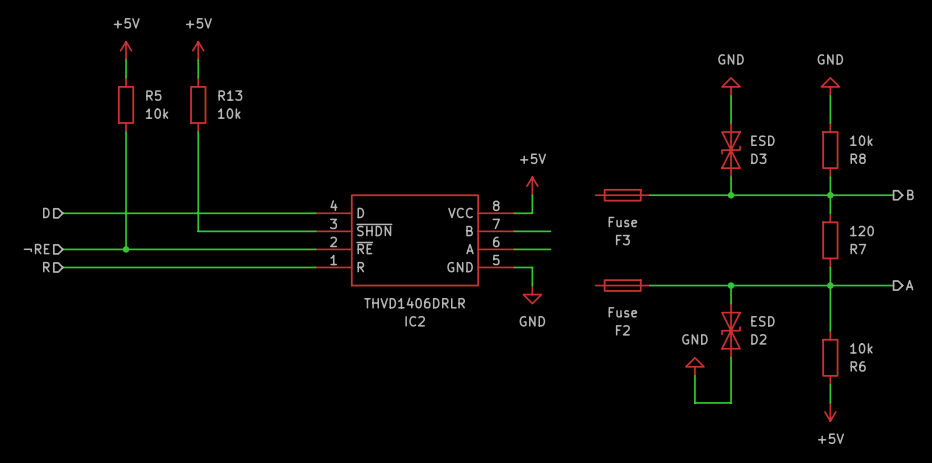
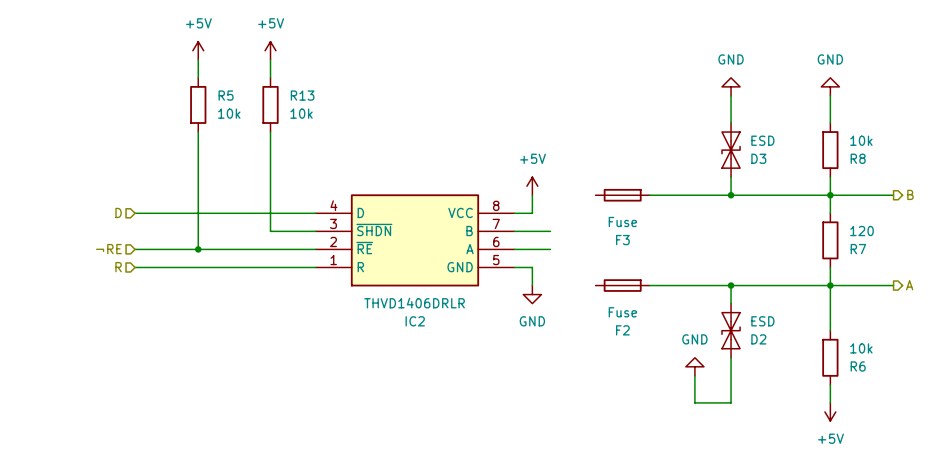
power symbol position: +5V (126, 50) -> +5V (270, 50)
wire: (126, 59) (126, 77) -> (270, 59) (270, 77)
R13 name: R13 (230, 95) -> R5 (226, 95)
R5: 10k (126, 104) -> none
R13: none -> 10k (270, 104)
wire: (126, 132) (126, 249) -> none
wire: none -> (270, 132) (270, 231)
hierarchical label position: D (46, 212) -> D (118, 212)
wire: (62, 213) (135, 213) -> none
wire: (198, 231) (270, 231) -> (198, 231) (198, 249)
hierarchical label position: ¬RE (36, 249) -> ¬RE (108, 249)
wire: (62, 249) (135, 249) -> none
junction: (126, 249) -> none
junction: none -> (198, 249)
hierarchical label position: R (46, 267) -> R (118, 267)
wire: (62, 267) (135, 267) -> none

